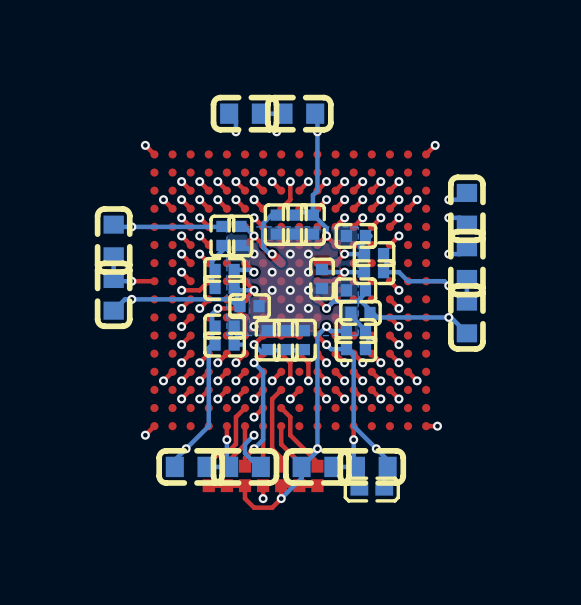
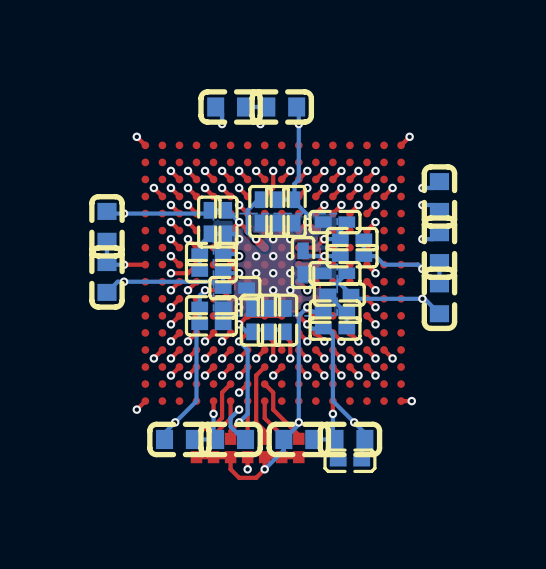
part footprint: [263, 203, 290, 247] -> [248, 184, 273, 238]
part footprint: [281, 203, 308, 247] -> [265, 184, 290, 238]
part footprint: [299, 203, 326, 247] -> [282, 184, 307, 238]
part footprint: [209, 214, 236, 258] -> [197, 195, 222, 249]
part footprint: [227, 214, 254, 258] -> [214, 195, 239, 249]
part footprint: [334, 222, 378, 249] -> [308, 209, 362, 235]
part footprint: [352, 241, 396, 268] -> [325, 226, 379, 252]
part footprint: [203, 256, 247, 283] -> [184, 241, 238, 267]
part footprint: [308, 257, 336, 301] -> [290, 236, 316, 290]
part footprint: [352, 259, 396, 286] -> [325, 243, 379, 269]
part footprint: [203, 275, 247, 302] -> [184, 258, 238, 284]
part footprint: [334, 277, 378, 304] -> [308, 260, 362, 286]
part footprint: [228, 293, 271, 320] -> [208, 275, 262, 301]
part footprint: [339, 299, 382, 326] -> [312, 282, 366, 307]
part footprint: [203, 313, 247, 340] -> [184, 295, 238, 320]
part footprint: [254, 318, 281, 362] -> [239, 293, 265, 347]
part footprint: [272, 318, 299, 362] -> [256, 293, 282, 347]
part footprint: [290, 318, 317, 362] -> [273, 293, 299, 347]
part footprint: [334, 318, 378, 345] -> [308, 299, 362, 324]
part footprint: [203, 331, 247, 358] -> [184, 312, 238, 337]
part footprint: [334, 336, 378, 363] -> [308, 316, 362, 341]

